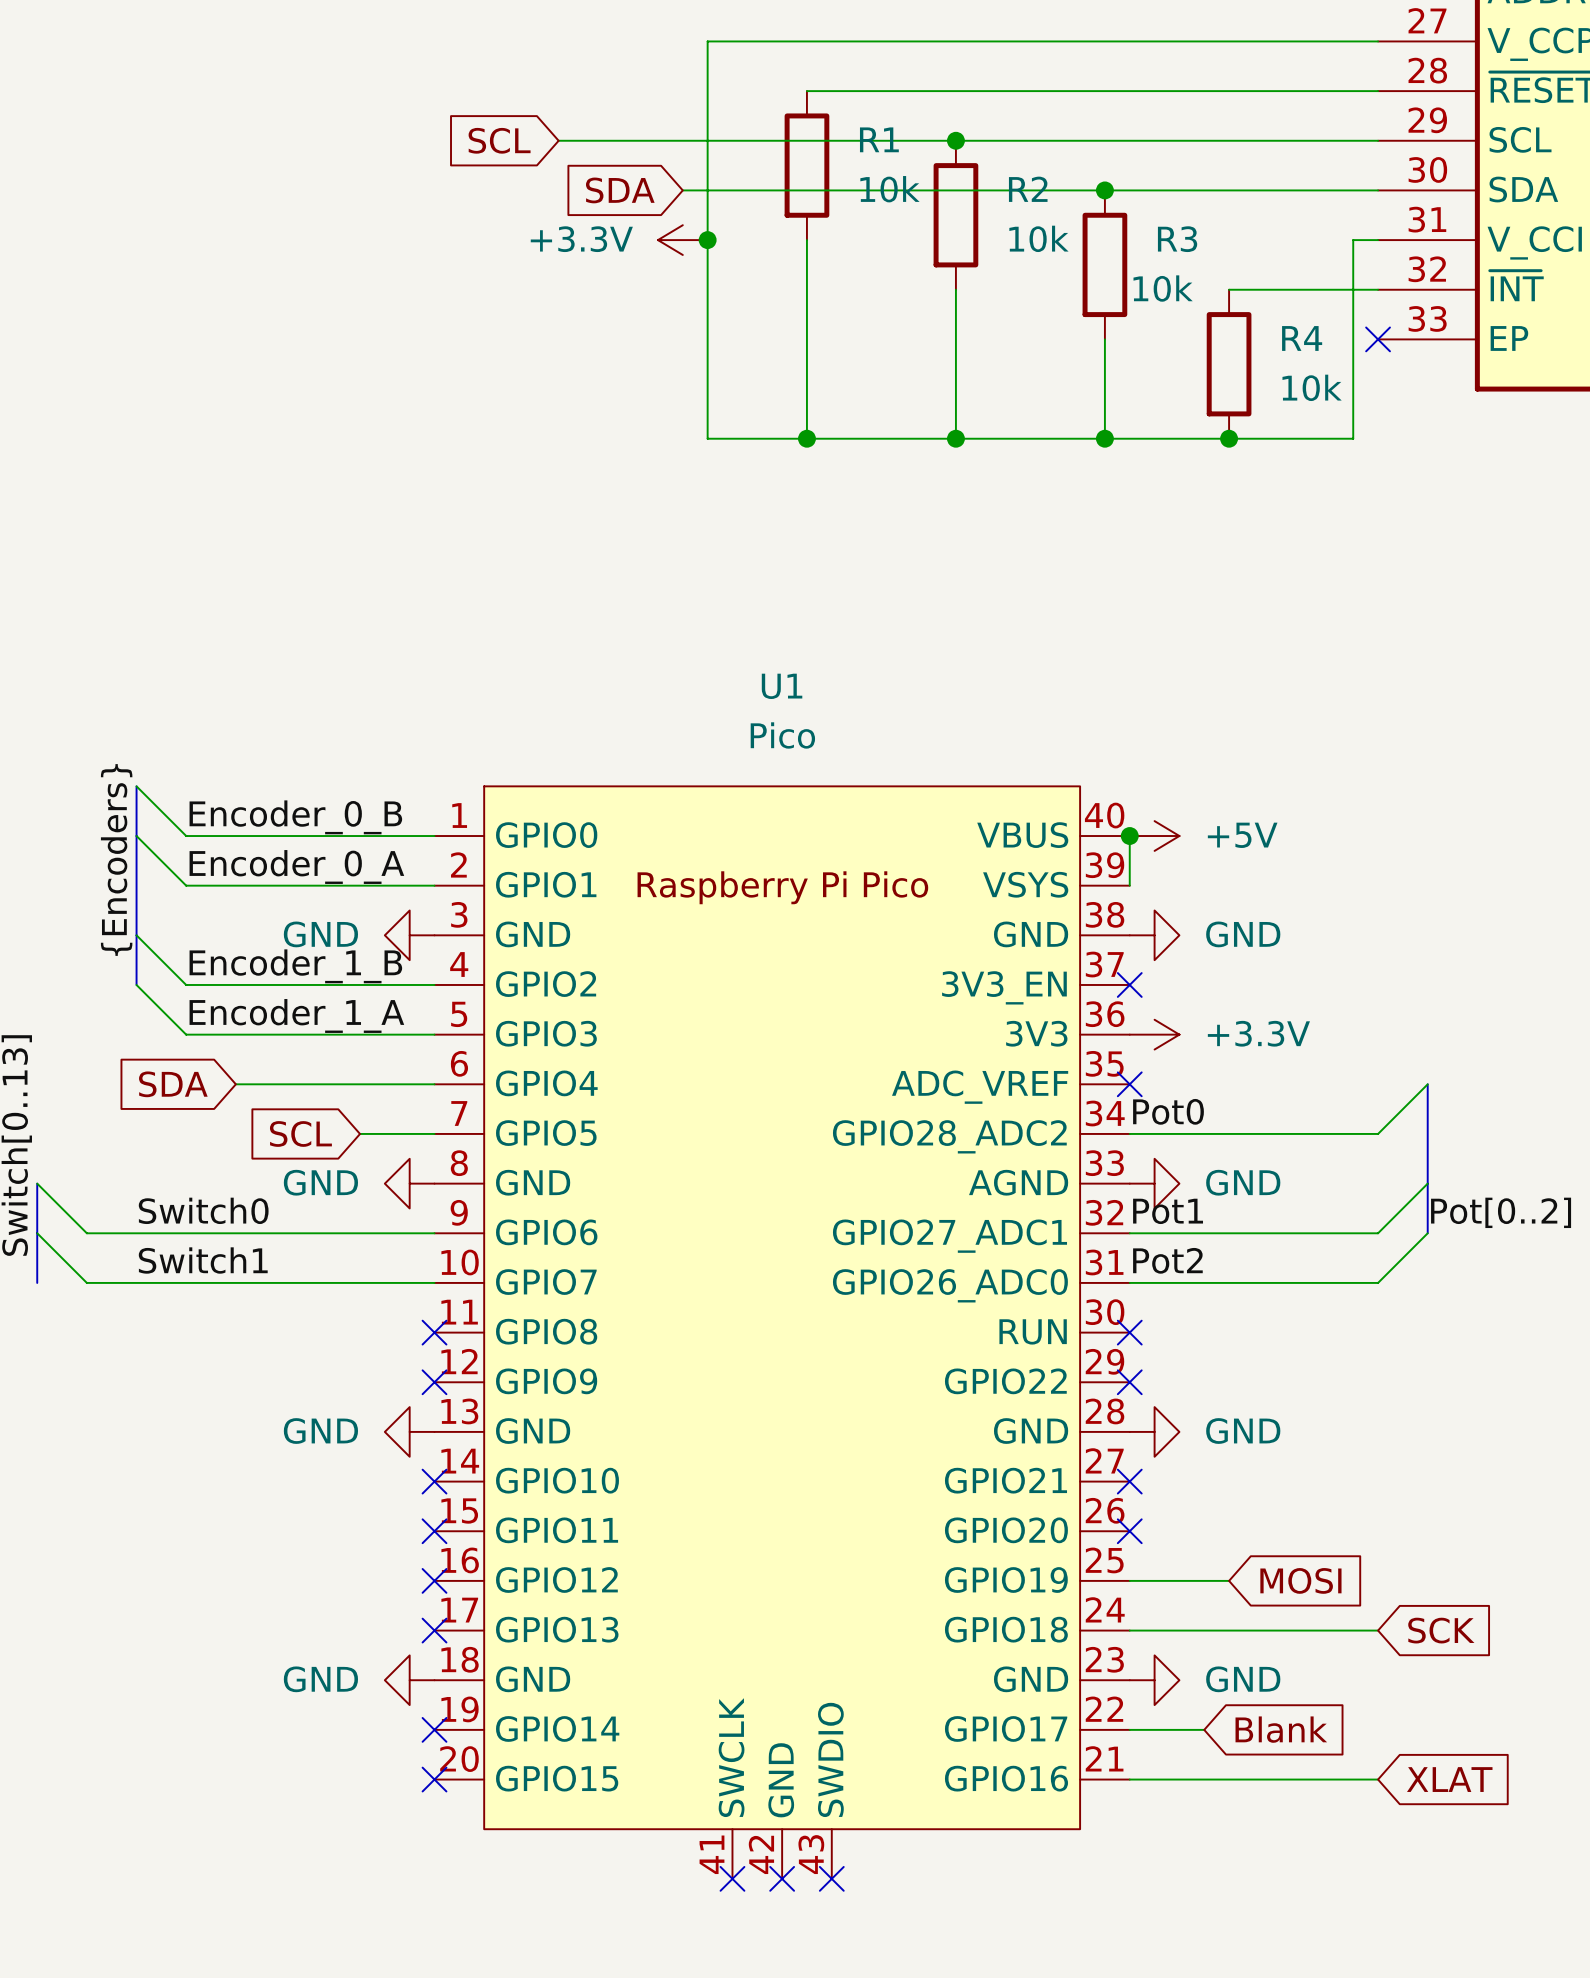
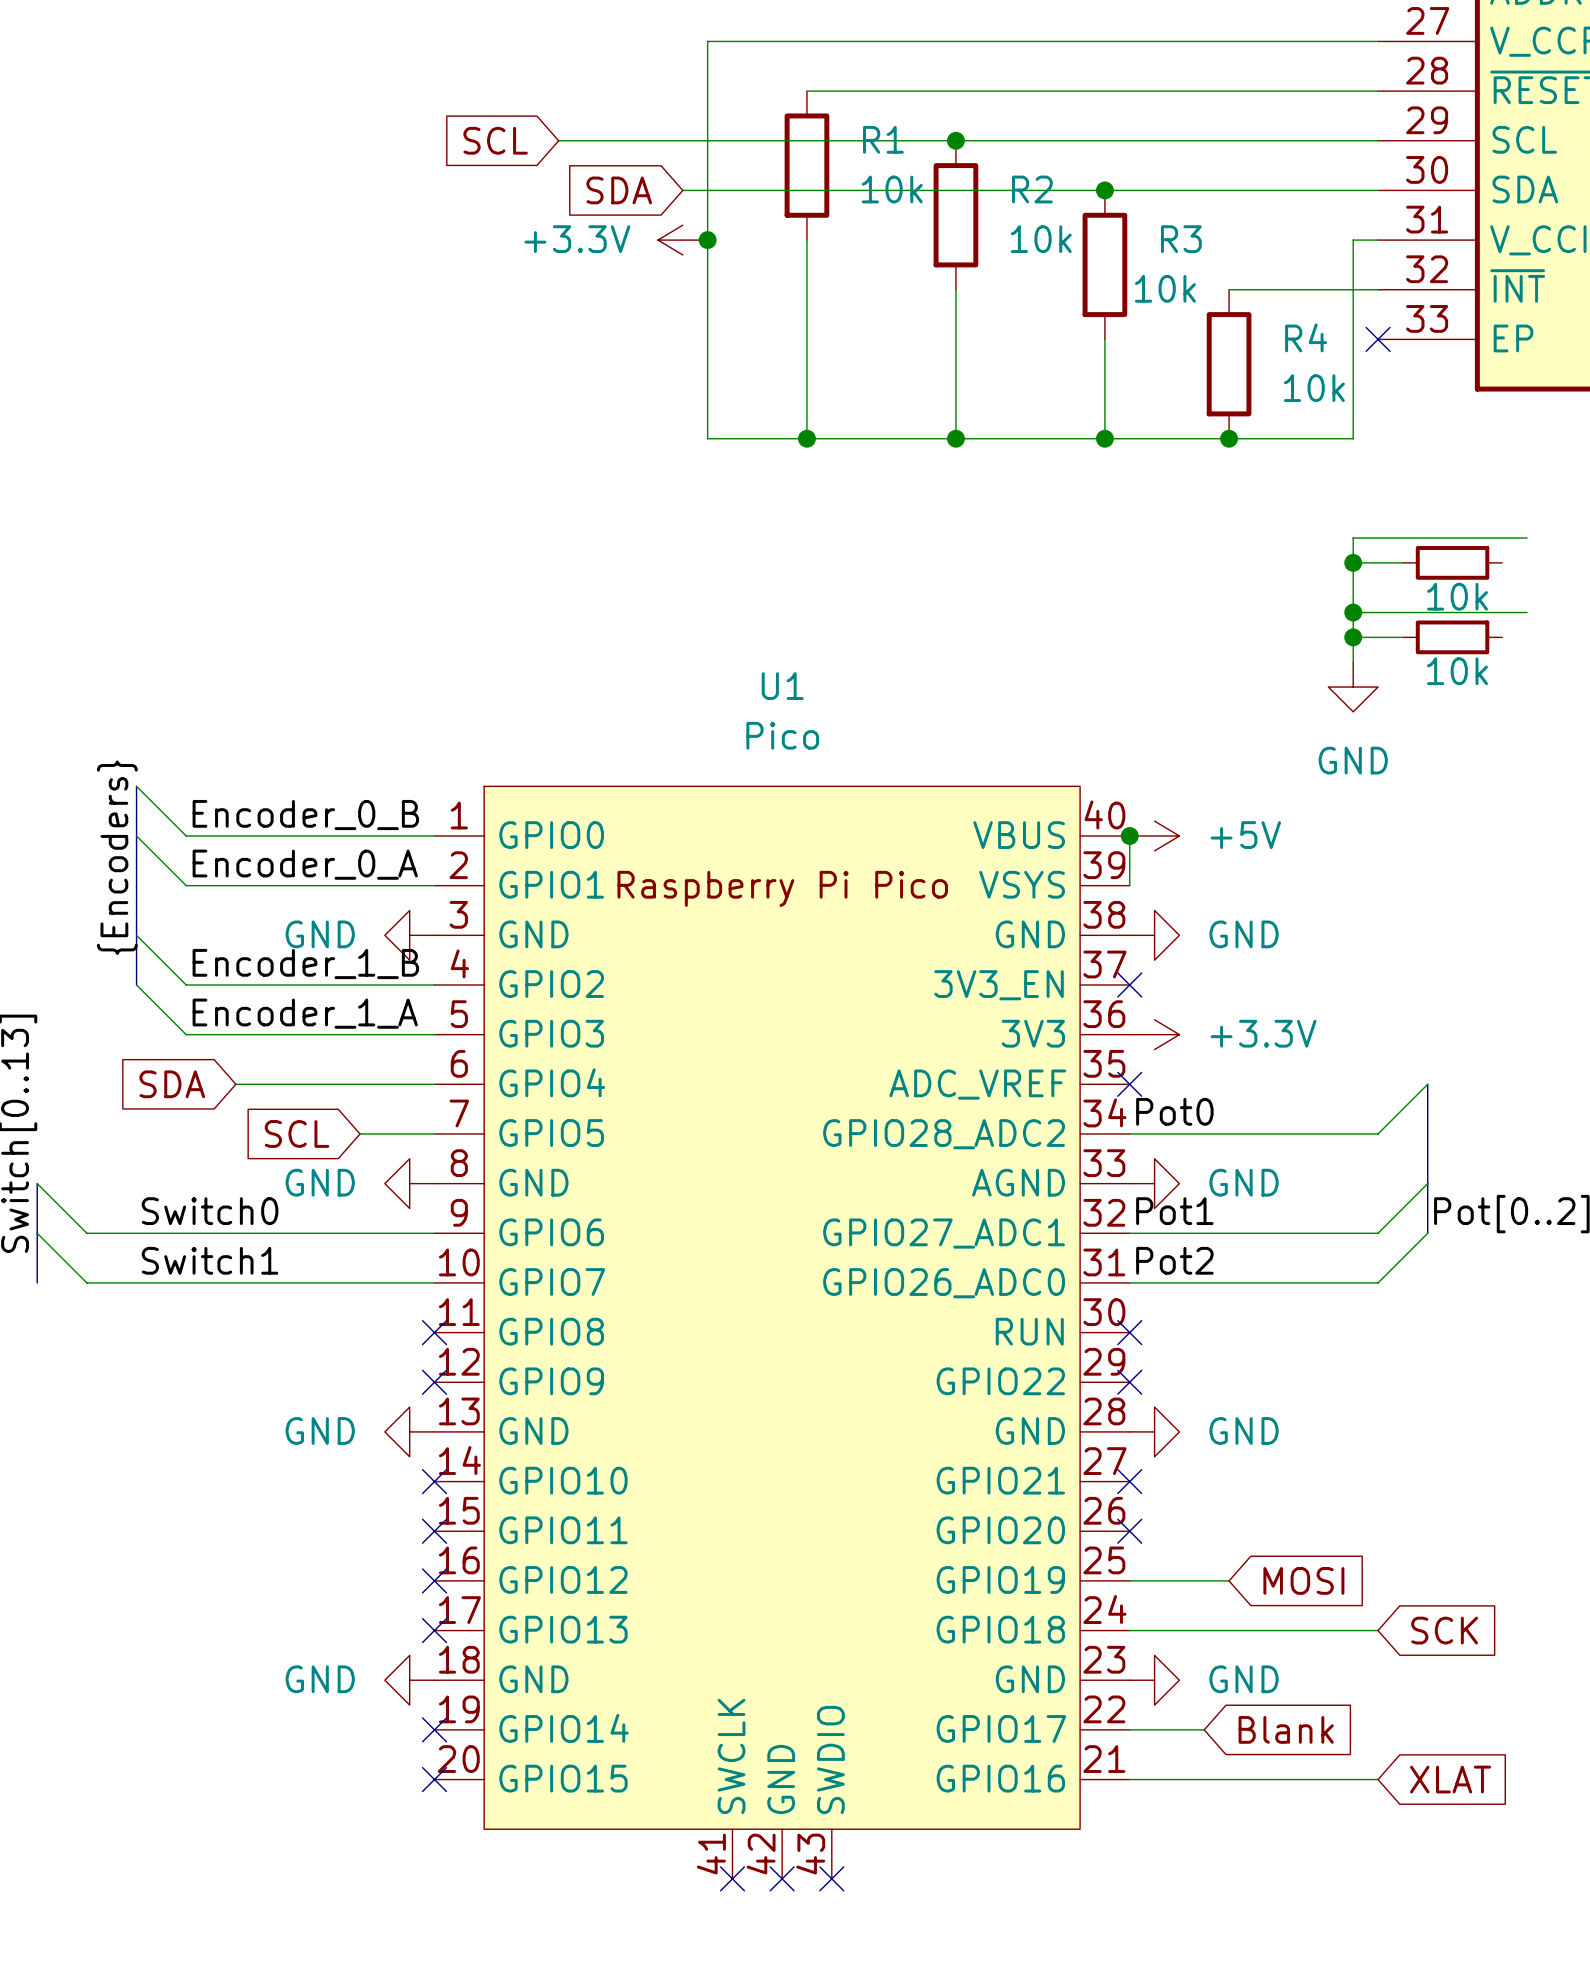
wire: none -> (1527, 538) (1353, 538) (1353, 662)
wire: none -> (1353, 562) (1402, 562)
junction: none -> (1353, 562)
part: none -> 10k (1452, 562)
wire: none -> (1353, 612) (1527, 612)
junction: none -> (1353, 612)
wire: none -> (1353, 637) (1402, 637)
junction: none -> (1353, 637)
part: none -> 10k (1452, 637)
power symbol: none -> GND (1353, 687)

